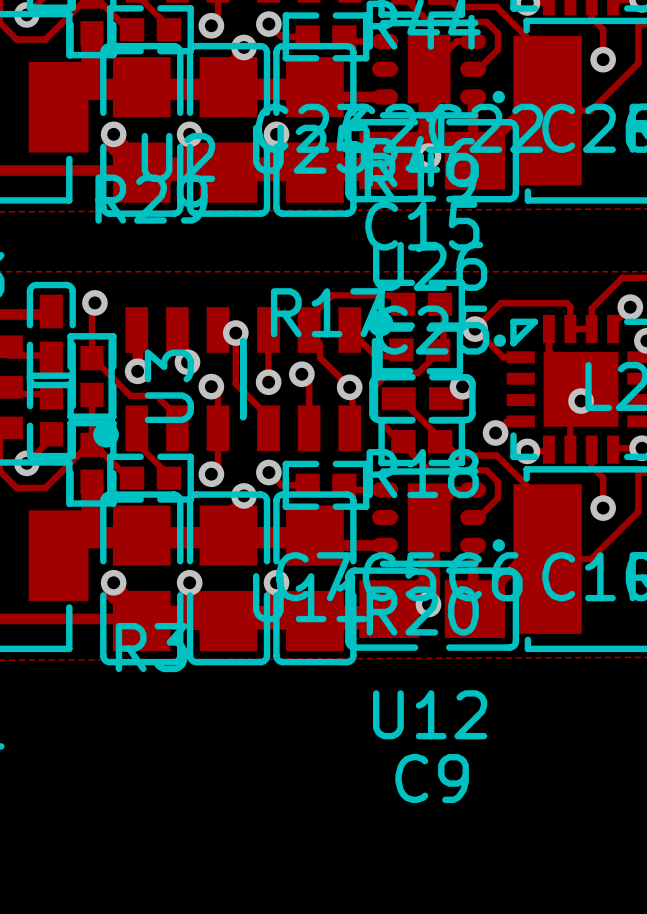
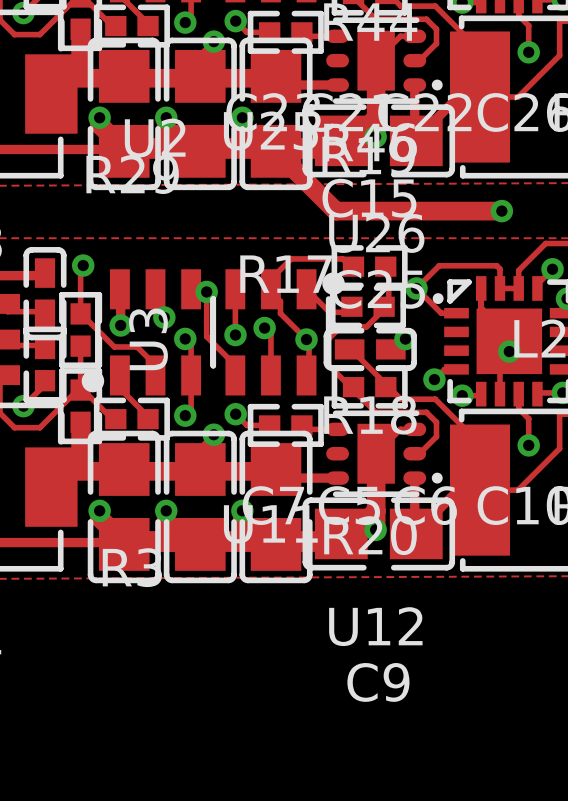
track: none -> (276, 151) (335, 211) (501, 211)
via: none -> (501, 211)

